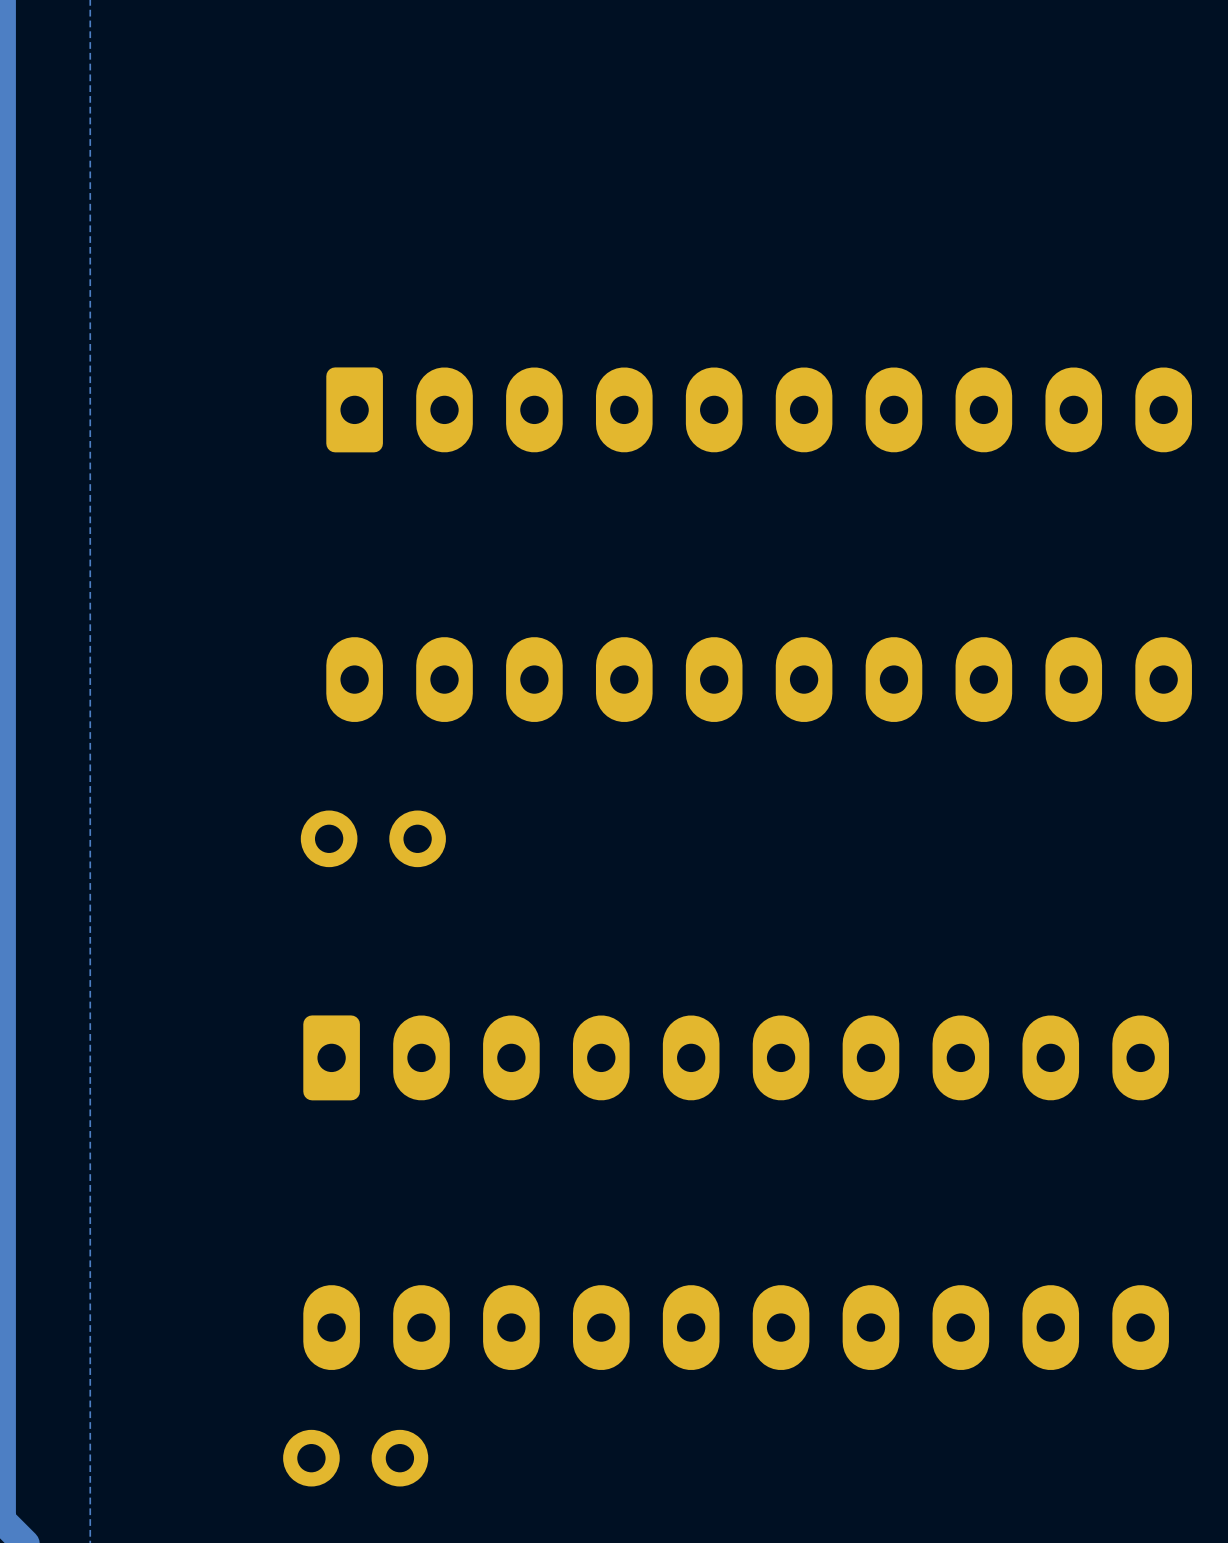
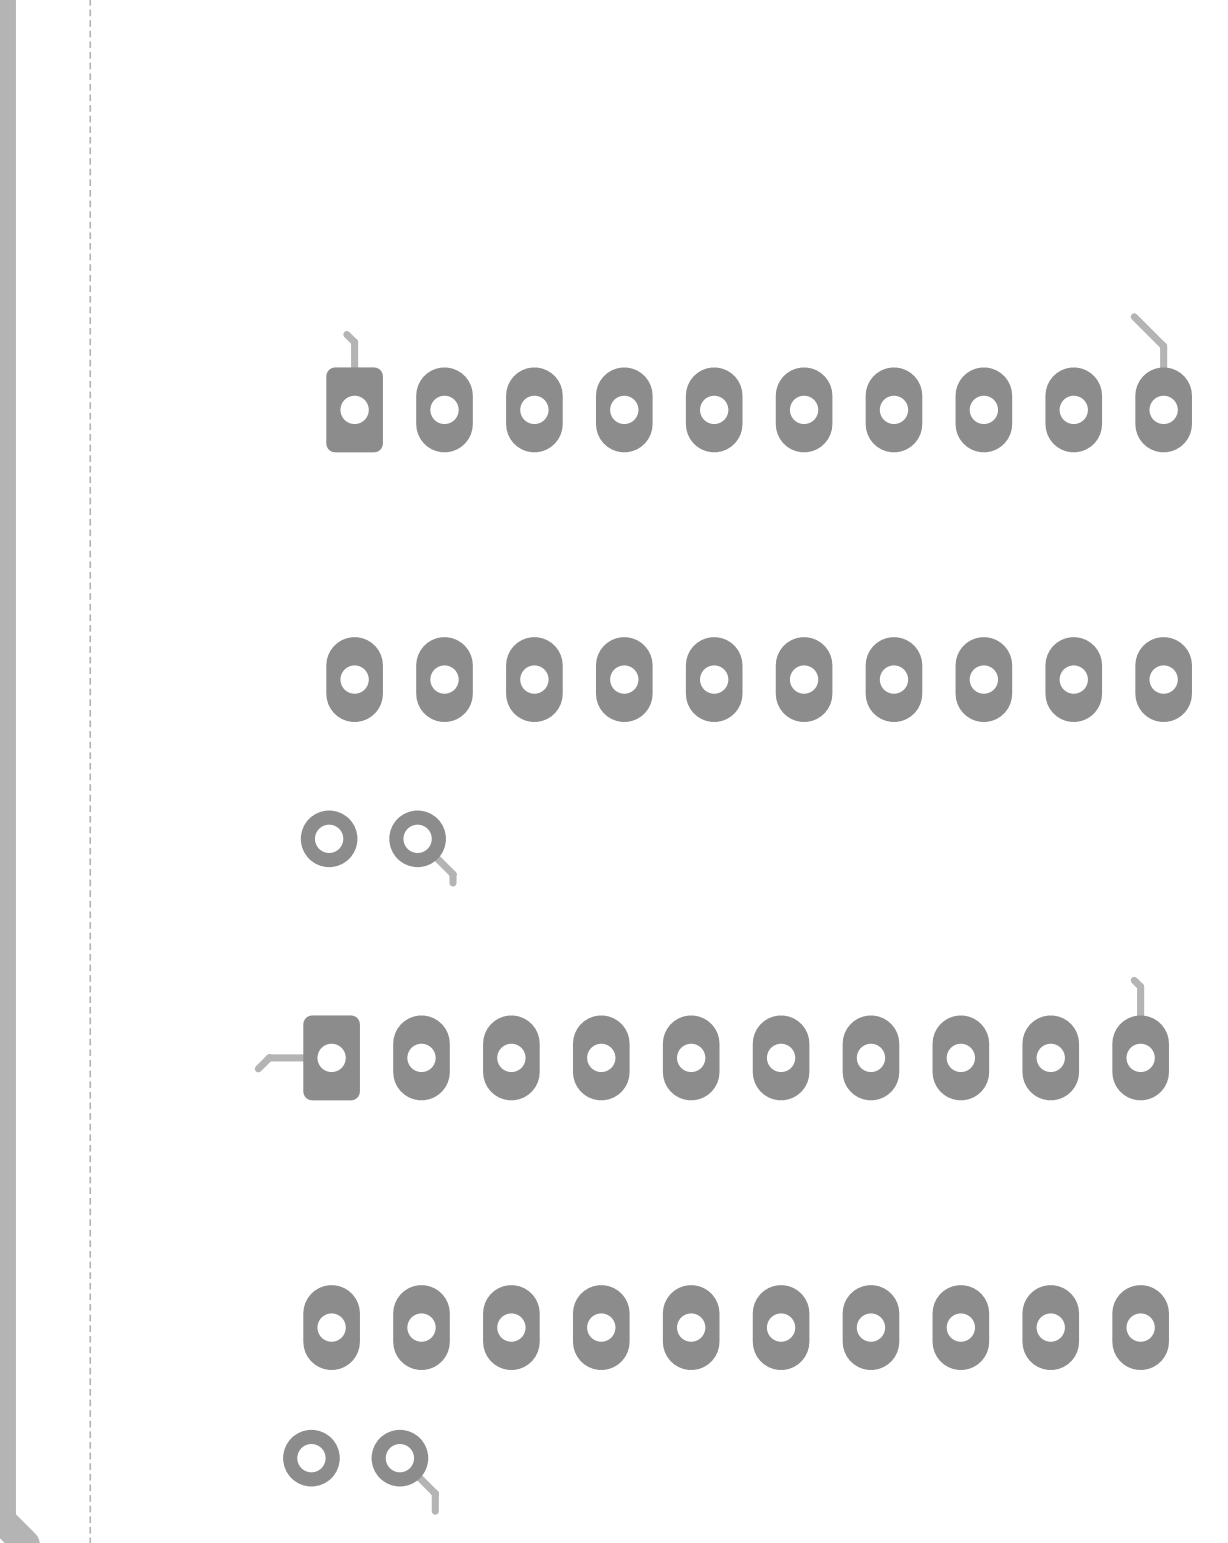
track: none -> (1134, 316) (1163, 346) (1163, 409)
track: none -> (346, 334) (354, 342) (354, 409)
track: none -> (417, 838) (453, 874) (453, 883)
track: none -> (1134, 980) (1140, 986) (1140, 1057)
track: none -> (331, 1057) (269, 1057) (258, 1068)
track: none -> (399, 1458) (435, 1493) (435, 1511)

